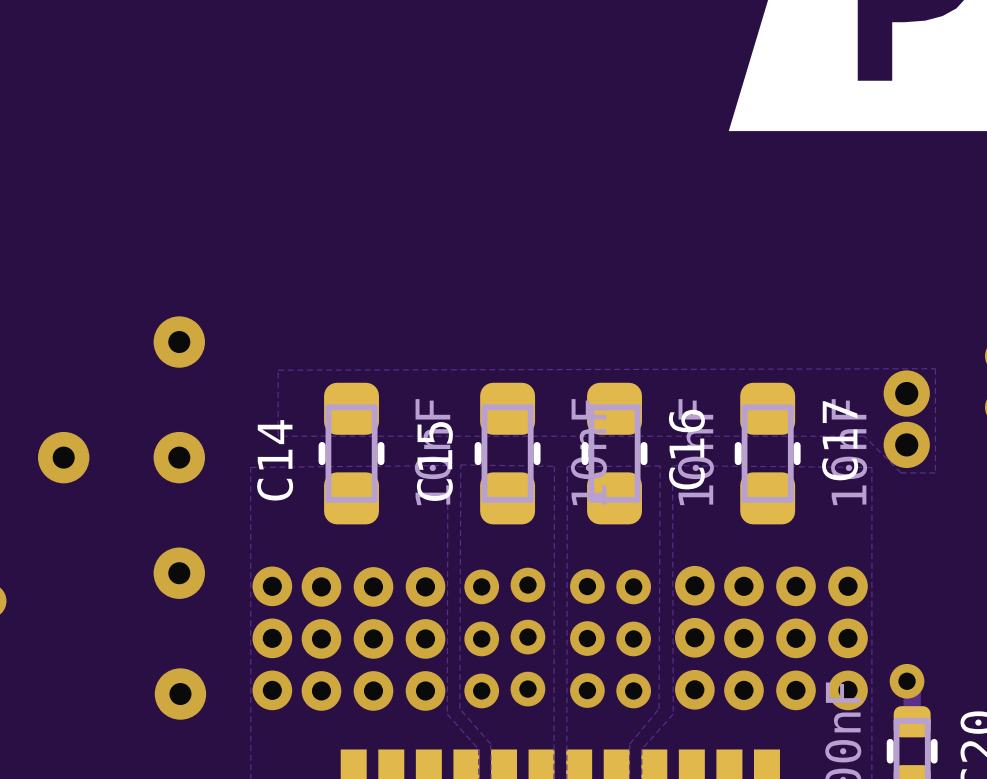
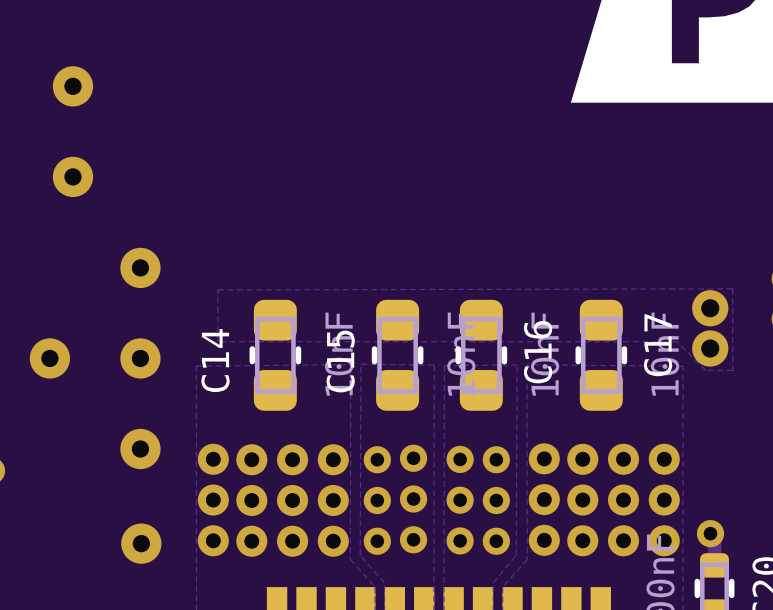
via: none -> (72, 86)
via: none -> (72, 176)

